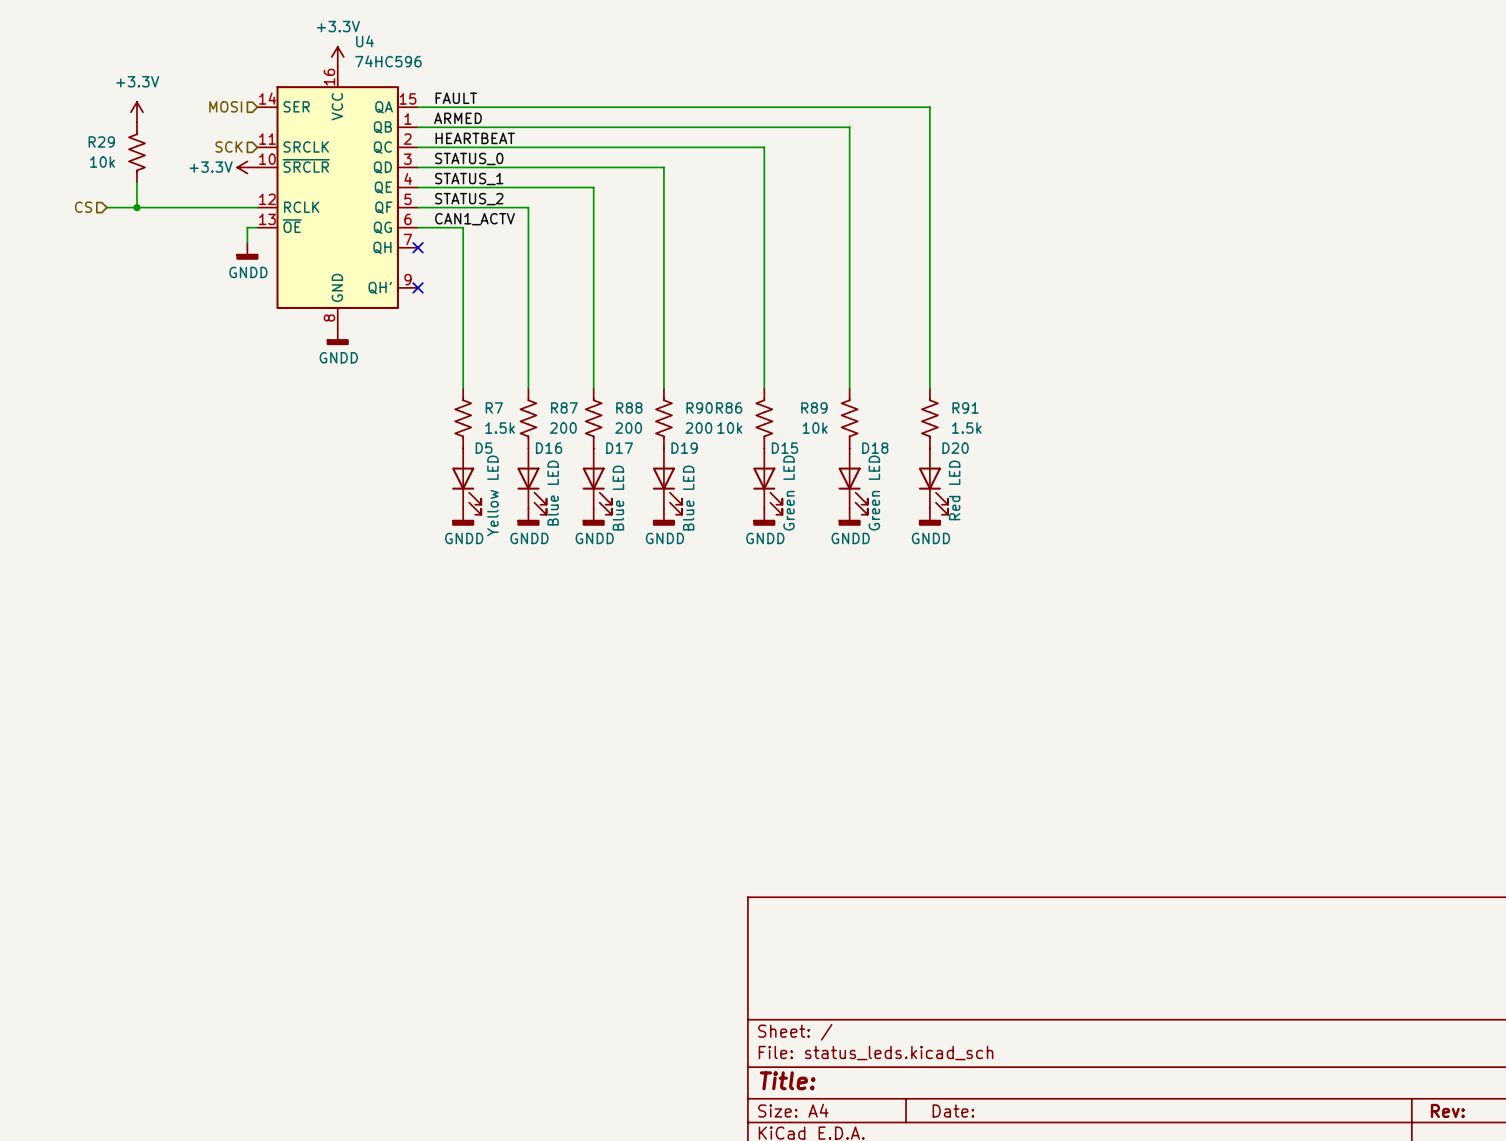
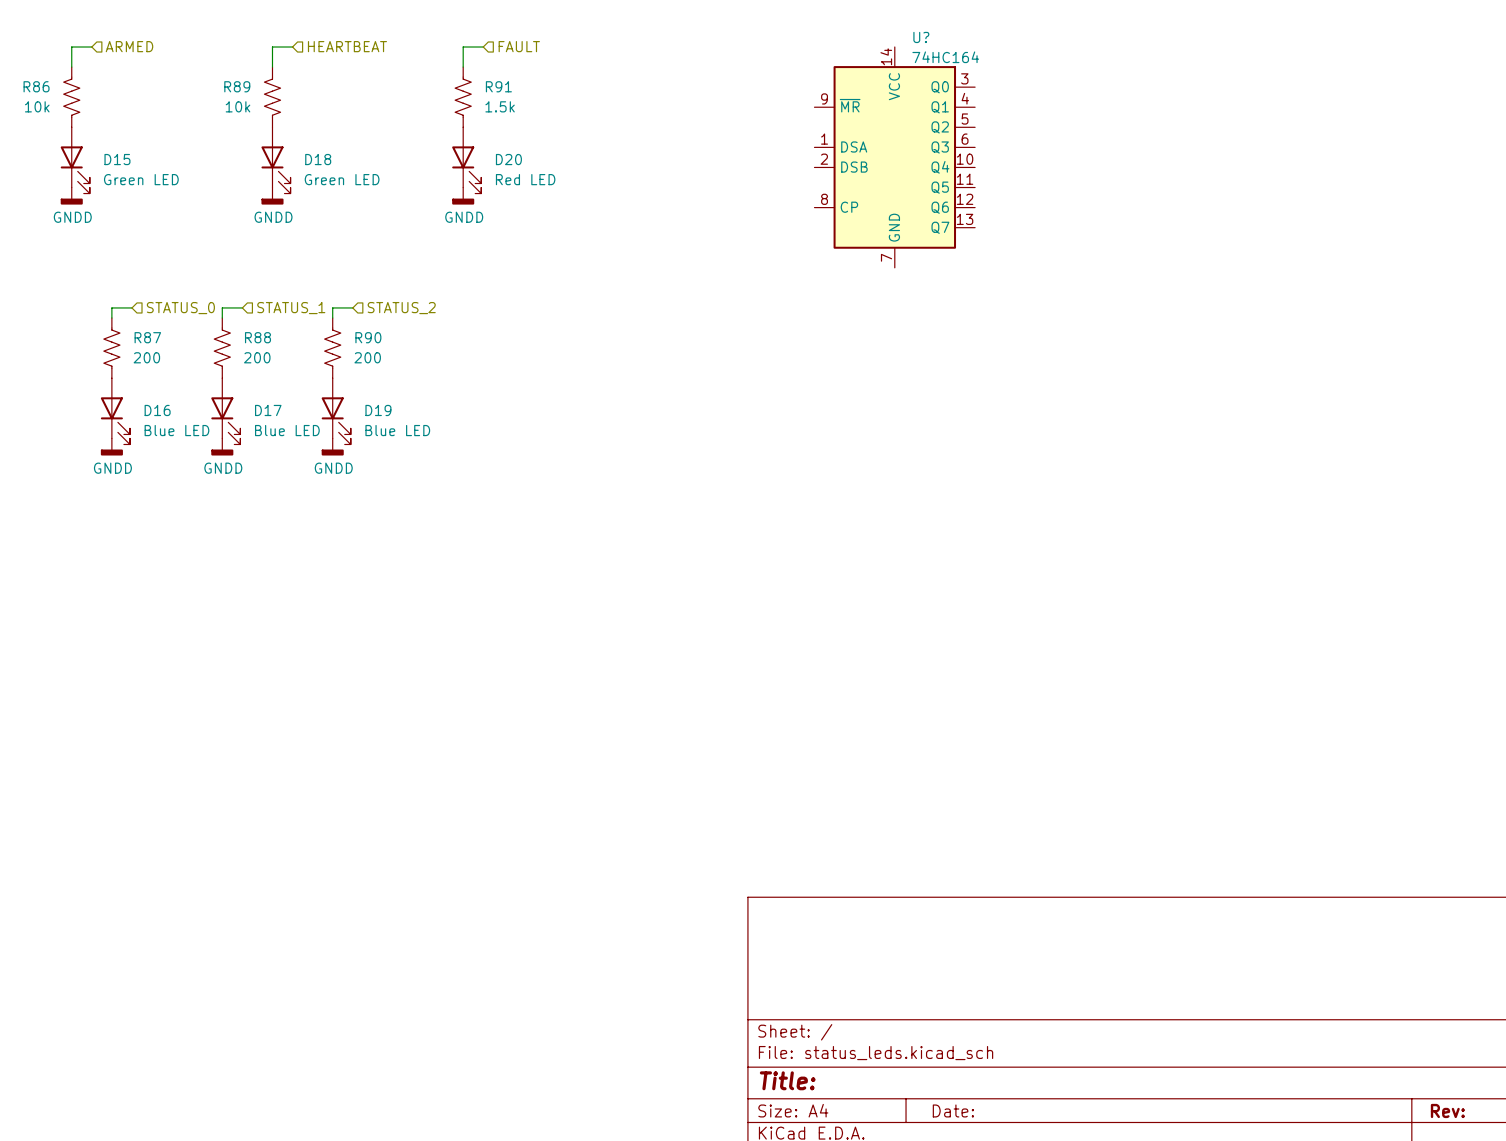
hierarchical label: none -> ARMED (129, 46)
hierarchical label: none -> HEARTBEAT (347, 46)
hierarchical label: none -> FAULT (519, 46)
wire: none -> (91, 47) (71, 47) (71, 67)
wire: none -> (292, 47) (272, 47) (272, 67)
wire: none -> (483, 47) (463, 47) (463, 67)
power symbol: +3.3V (337, 57) -> none
label: FAULT (456, 98) -> none
hierarchical label: MOSI (225, 106) -> none
wire: (418, 107) (929, 107) (929, 388) -> none
power symbol: +3.3V (136, 112) -> none
label: ARMED (458, 118) -> none
wire: (418, 127) (849, 127) (849, 388) -> none
label: HEARTBEAT (475, 138) -> none
hierarchical label: SCK (229, 147) -> none
wire: (418, 147) (764, 147) (764, 388) -> none
R29: 10k (136, 152) -> none
U?: none -> 74HC164 (894, 157)
label: STATUS_0 (469, 158) -> none
power symbol: +3.3V (247, 167) -> none
wire: (418, 167) (663, 167) (663, 388) -> none
label: STATUS_1 (469, 179) -> none
wire: (136, 182) (136, 207) -> none
wire: (418, 187) (593, 187) (593, 388) -> none
power symbol: none -> GNDD (71, 196)
power symbol: none -> GNDD (463, 196)
U4: 74HC596 (337, 197) -> none
label: STATUS_2 (469, 199) -> none
hierarchical label: CS (83, 207) -> none
wire: (106, 207) (257, 207) -> none
junction: (136, 207) -> none
wire: (418, 207) (528, 207) (528, 388) -> none
label: CAN1_ACTV (474, 219) -> none
wire: (257, 227) (247, 227) (247, 242) -> none
wire: (418, 227) (463, 227) (463, 388) -> none
no-connect mark: (418, 247) -> none
power symbol position: GNDD (247, 251) -> GNDD (272, 196)
no-connect mark: (418, 287) -> none
wire: none -> (131, 307) (111, 307) (111, 318)
wire: none -> (242, 307) (222, 307) (222, 318)
hierarchical label: none -> STATUS_0 (180, 308)
hierarchical label: none -> STATUS_1 (291, 308)
hierarchical label: none -> STATUS_2 (401, 308)
power symbol: GNDD (337, 336) -> none
R7: 1.5k (463, 418) -> none
R87 position: (528, 418) -> (111, 348)
R88 position: (593, 418) -> (222, 348)
R90 position: (663, 418) -> (332, 348)
R86 position: (764, 418) -> (71, 97)
R89 position: (849, 418) -> (272, 97)
R91 position: (929, 418) -> (463, 97)
power symbol: none -> GNDD (111, 446)
power symbol: none -> GNDD (222, 446)
power symbol: none -> GNDD (332, 446)
D16 name position: D16 (549, 448) -> D16 (157, 410)
D17 name position: D17 (619, 448) -> D17 (268, 410)
D19 name position: D19 (684, 448) -> D19 (378, 410)
D15 name position: D15 (784, 448) -> D15 (117, 159)
D18 name position: D18 (875, 448) -> D18 (318, 159)
D20 name position: D20 (955, 448) -> D20 (508, 159)
D5: Yellow LED (466, 481) -> none
D16 position: (531, 481) -> (115, 411)
D17 position: (597, 481) -> (225, 411)
D19 position: (667, 481) -> (336, 411)
D15 position: (767, 481) -> (75, 160)
D18 position: (853, 481) -> (276, 160)
D20 position: (933, 481) -> (466, 160)
D20 value rotation: 0° (954, 490) -> 90° clockwise (525, 179)
D16 value rotation: 0° (553, 493) -> 90° clockwise (176, 430)
D15 value rotation: 0° (789, 493) -> 90° clockwise (141, 179)
D18 value rotation: 0° (874, 493) -> 90° clockwise (342, 179)
D17 value rotation: 0° (618, 498) -> 90° clockwise (287, 430)
D19 value rotation: 0° (688, 498) -> 90° clockwise (397, 430)
power symbol: GNDD (463, 517) -> none
power symbol: GNDD (528, 517) -> none
power symbol: GNDD (593, 517) -> none
power symbol: GNDD (663, 517) -> none
power symbol: GNDD (764, 517) -> none
power symbol: GNDD (849, 517) -> none
power symbol: GNDD (929, 517) -> none

